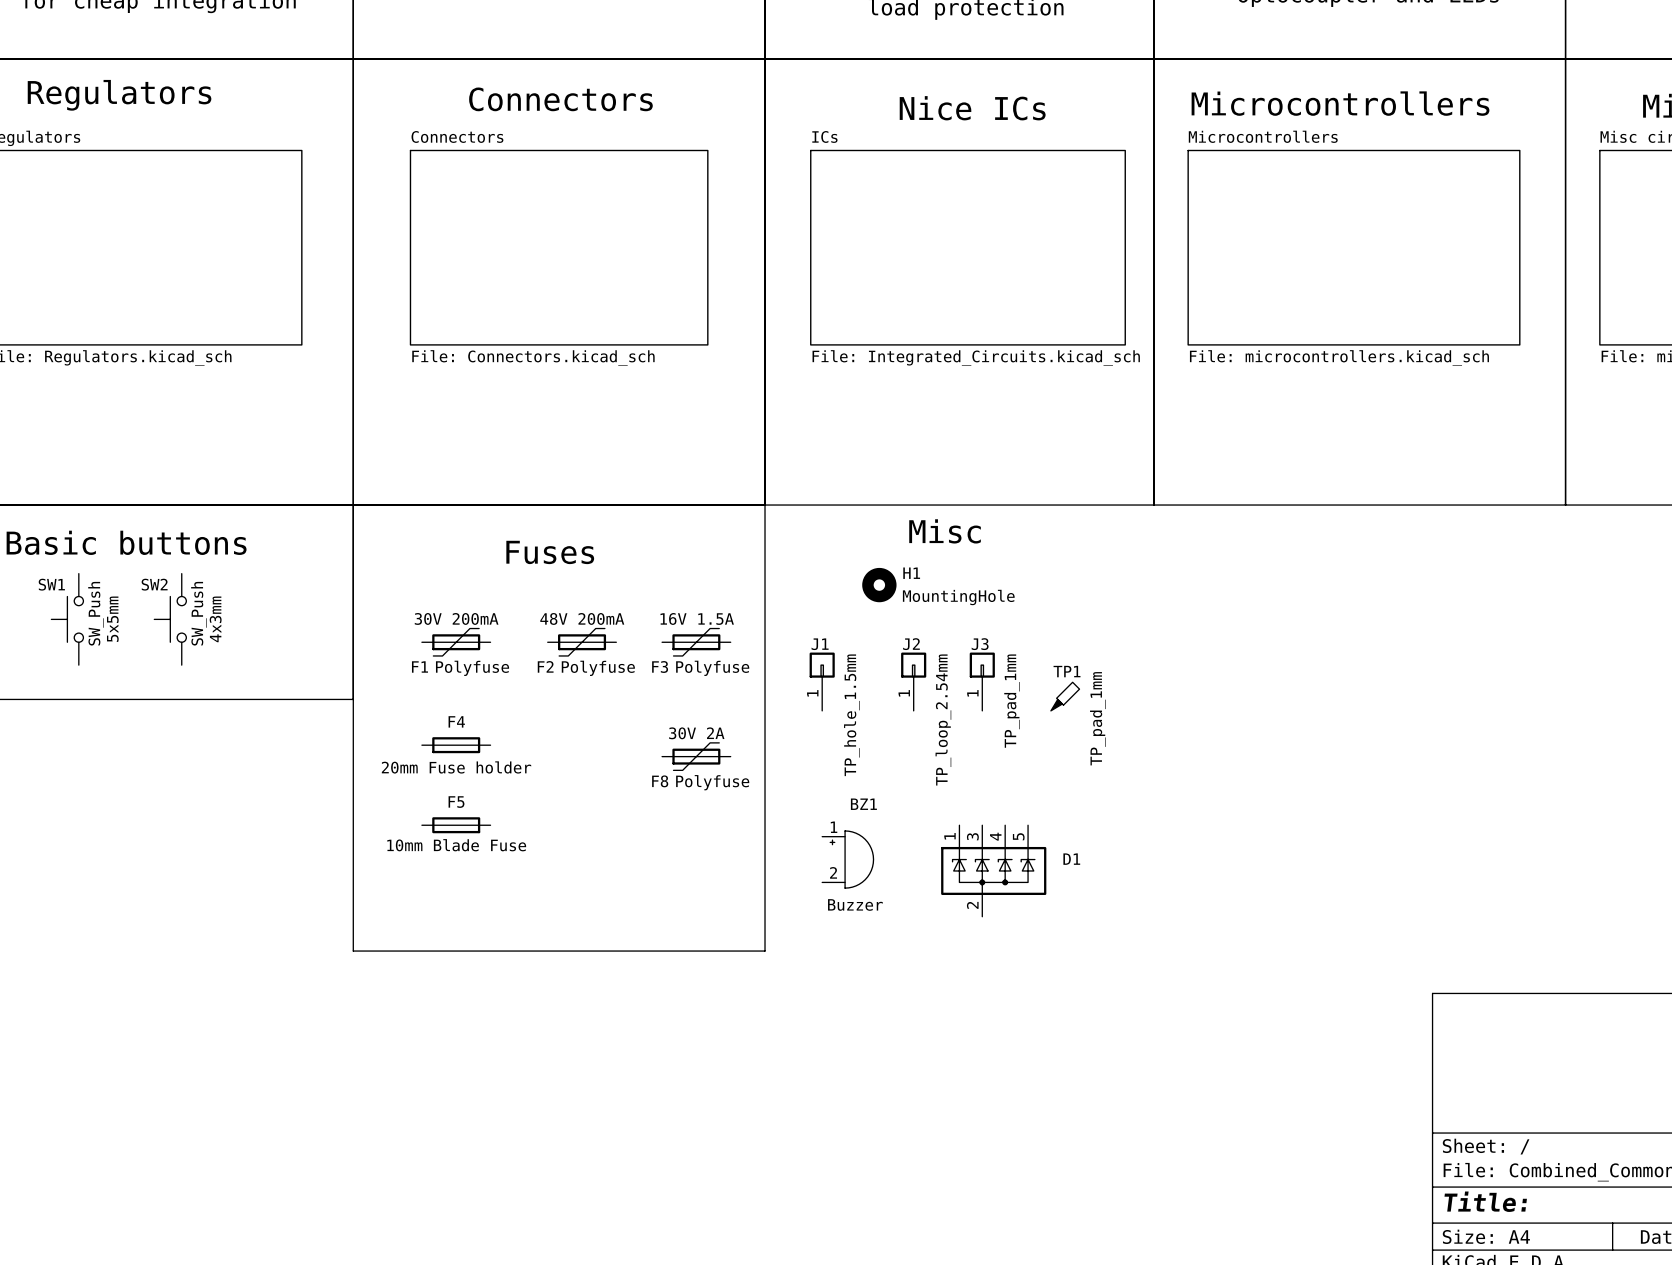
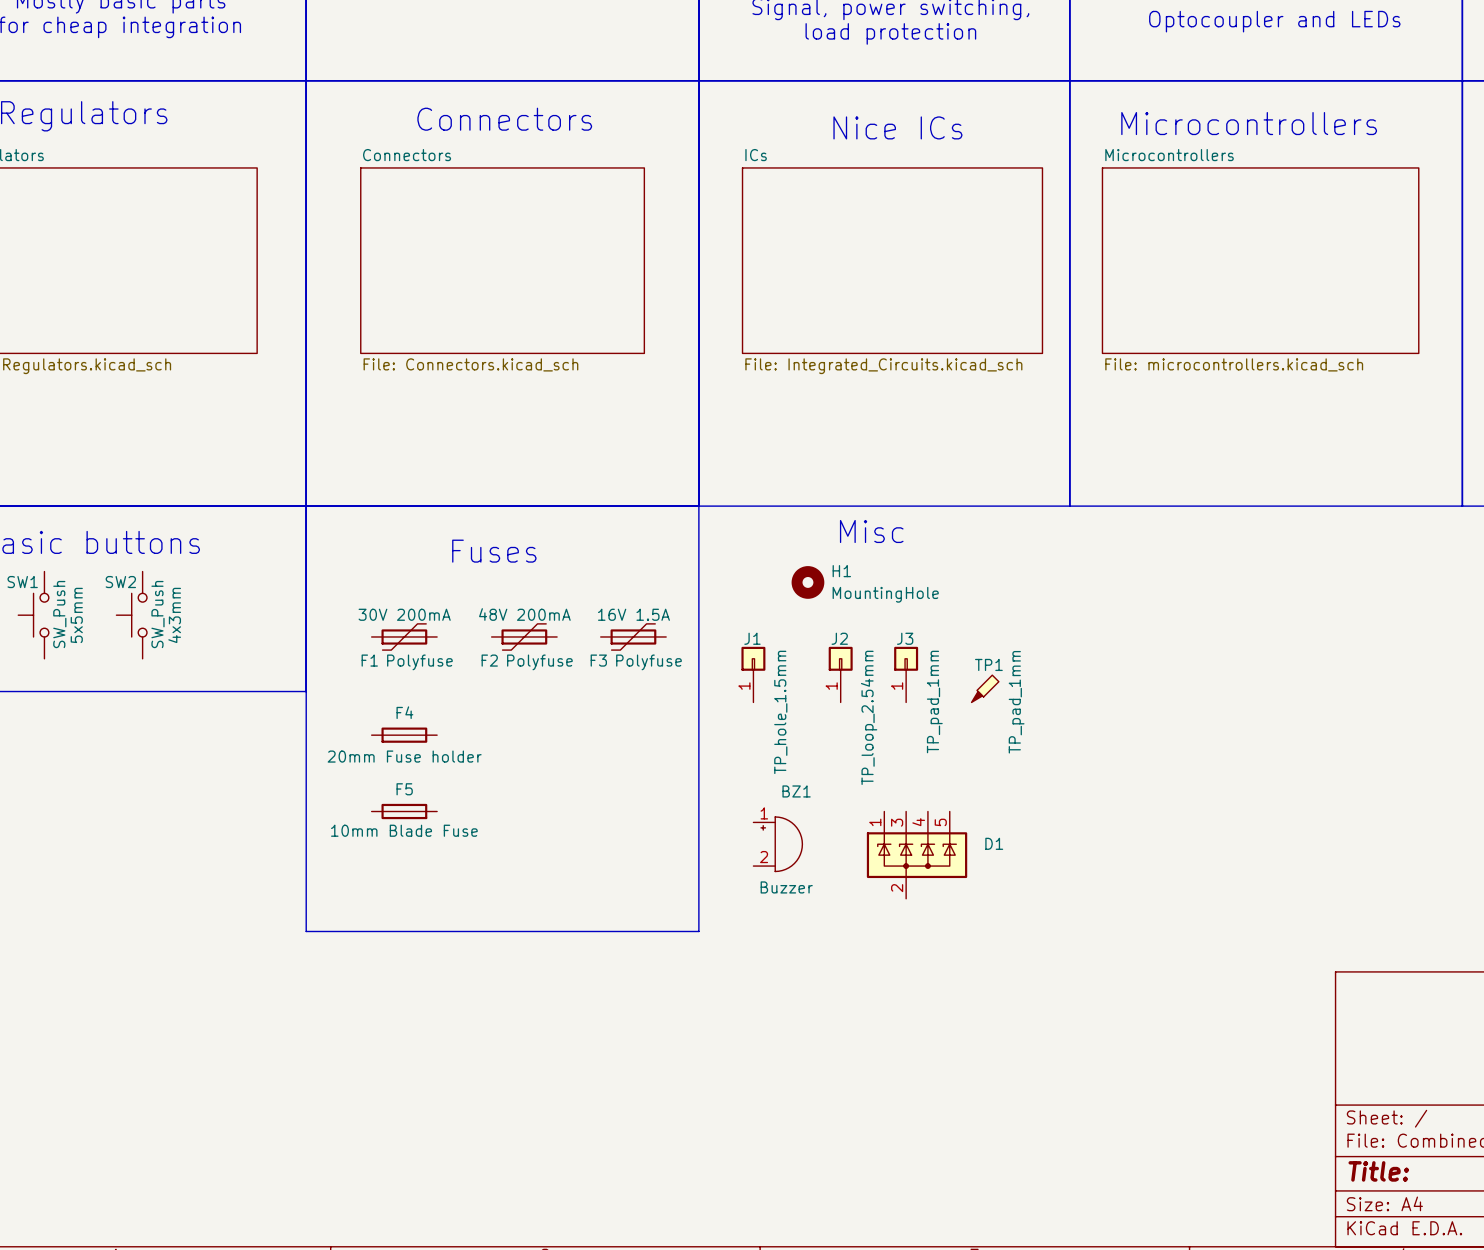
F8: Polyfuse (696, 756) -> none

